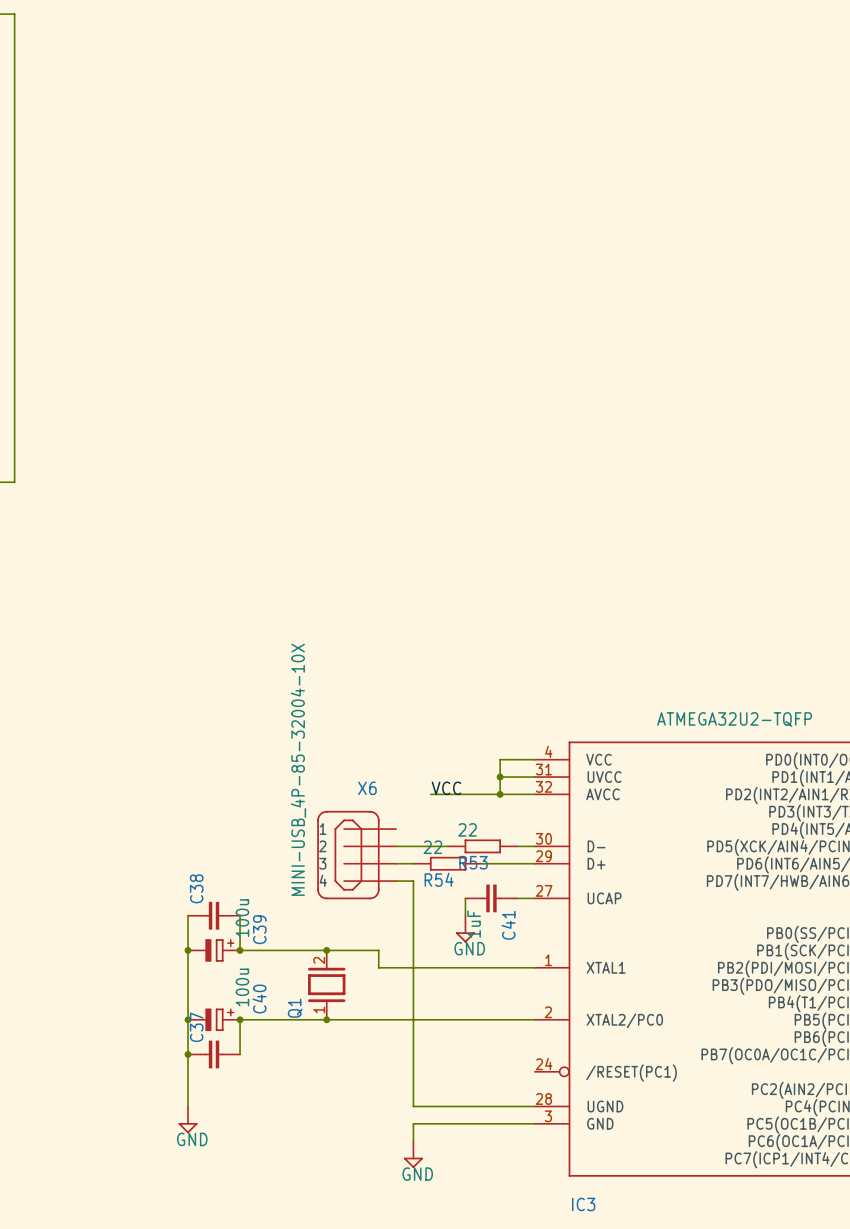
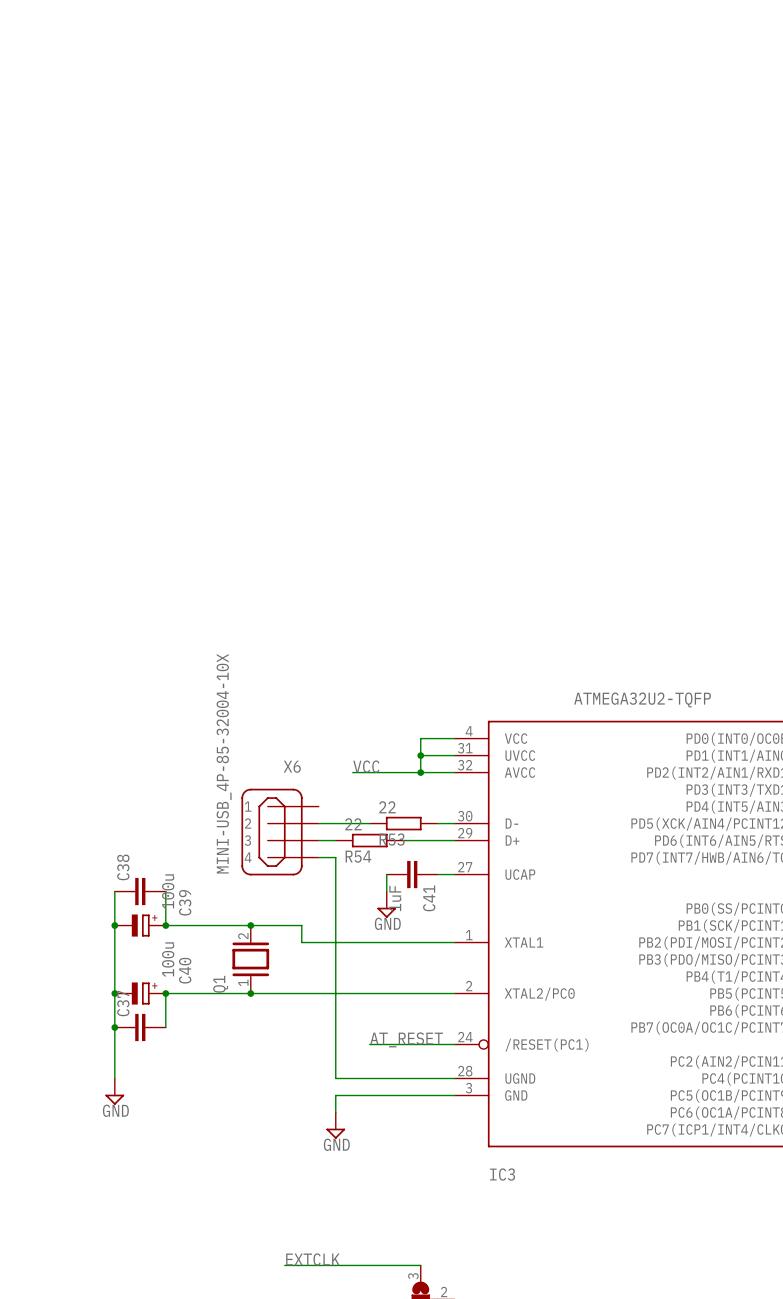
label: none -> AT_RESET (406, 1039)
wire: none -> (369, 1044) (454, 1044)

